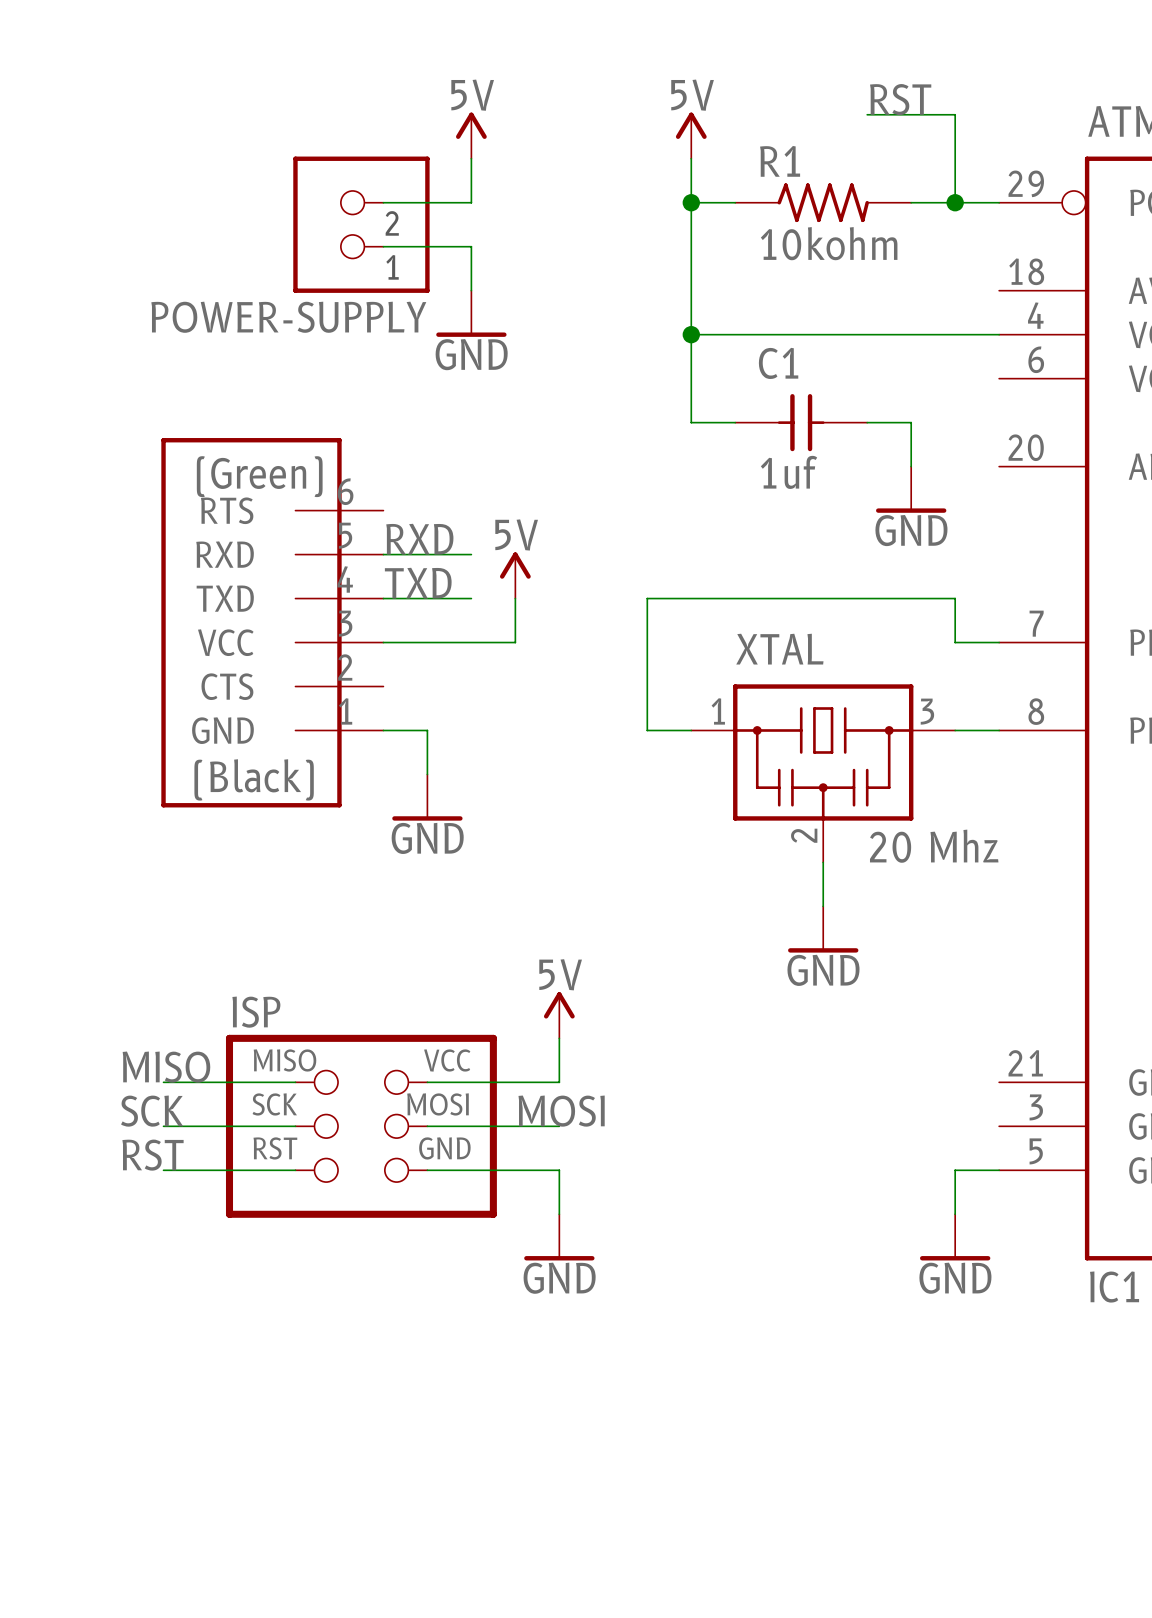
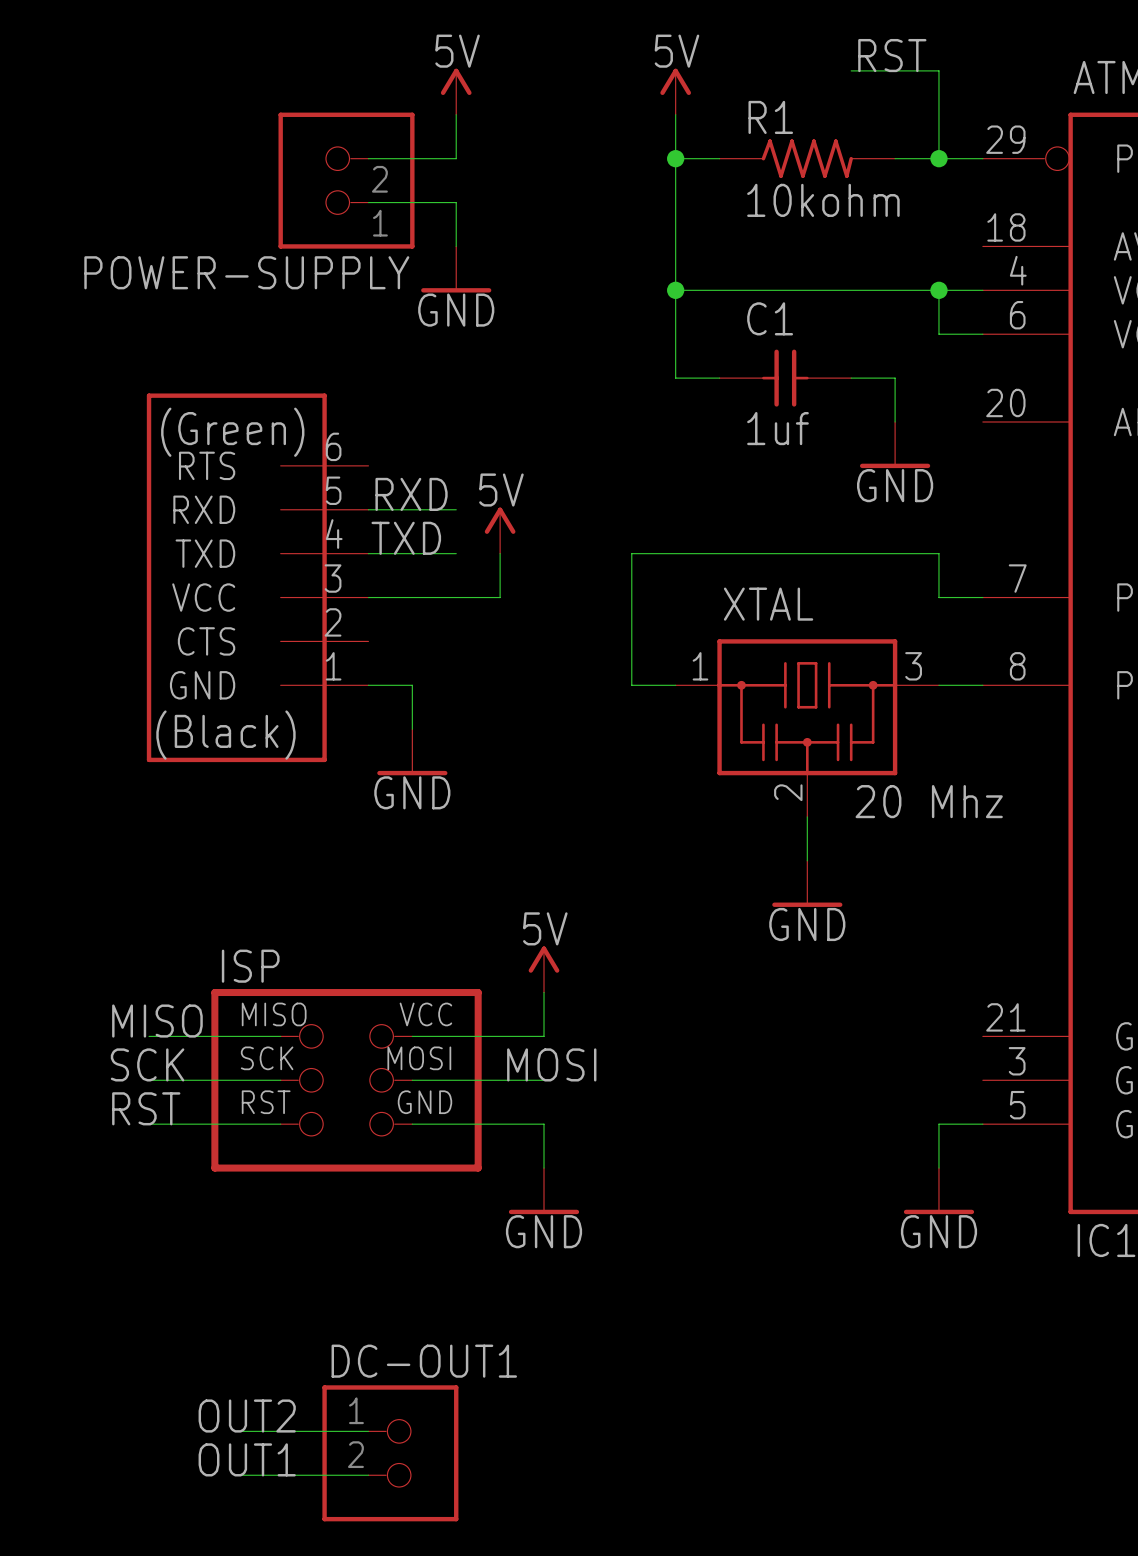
wire: none -> (938, 290) (938, 334) (982, 334)
junction: none -> (938, 290)
label: none -> OUT2 (247, 1416)
wire: none -> (236, 1431) (368, 1431)
DC-OUT1: none -> (390, 1453)
label: none -> OUT1 (247, 1459)
wire: none -> (236, 1475) (368, 1475)

